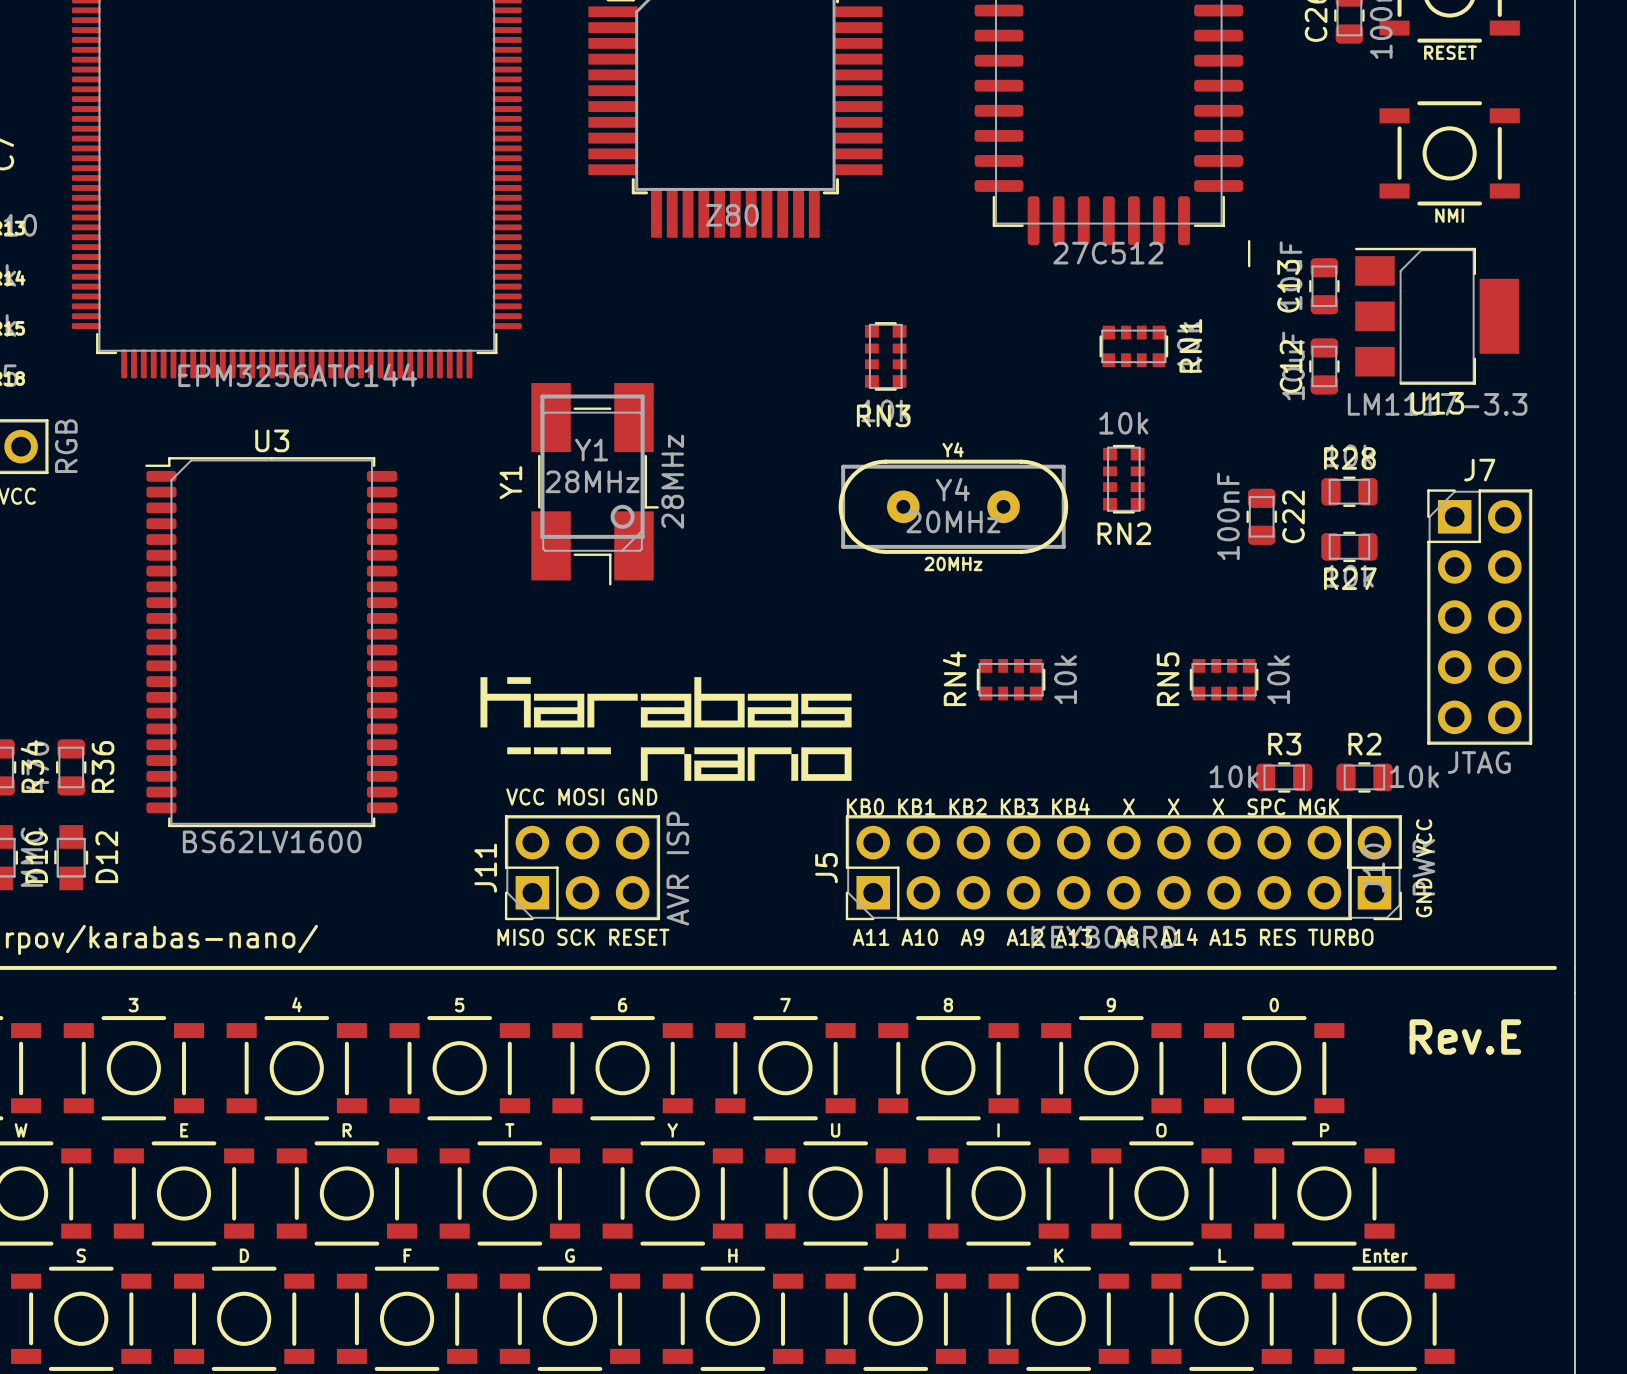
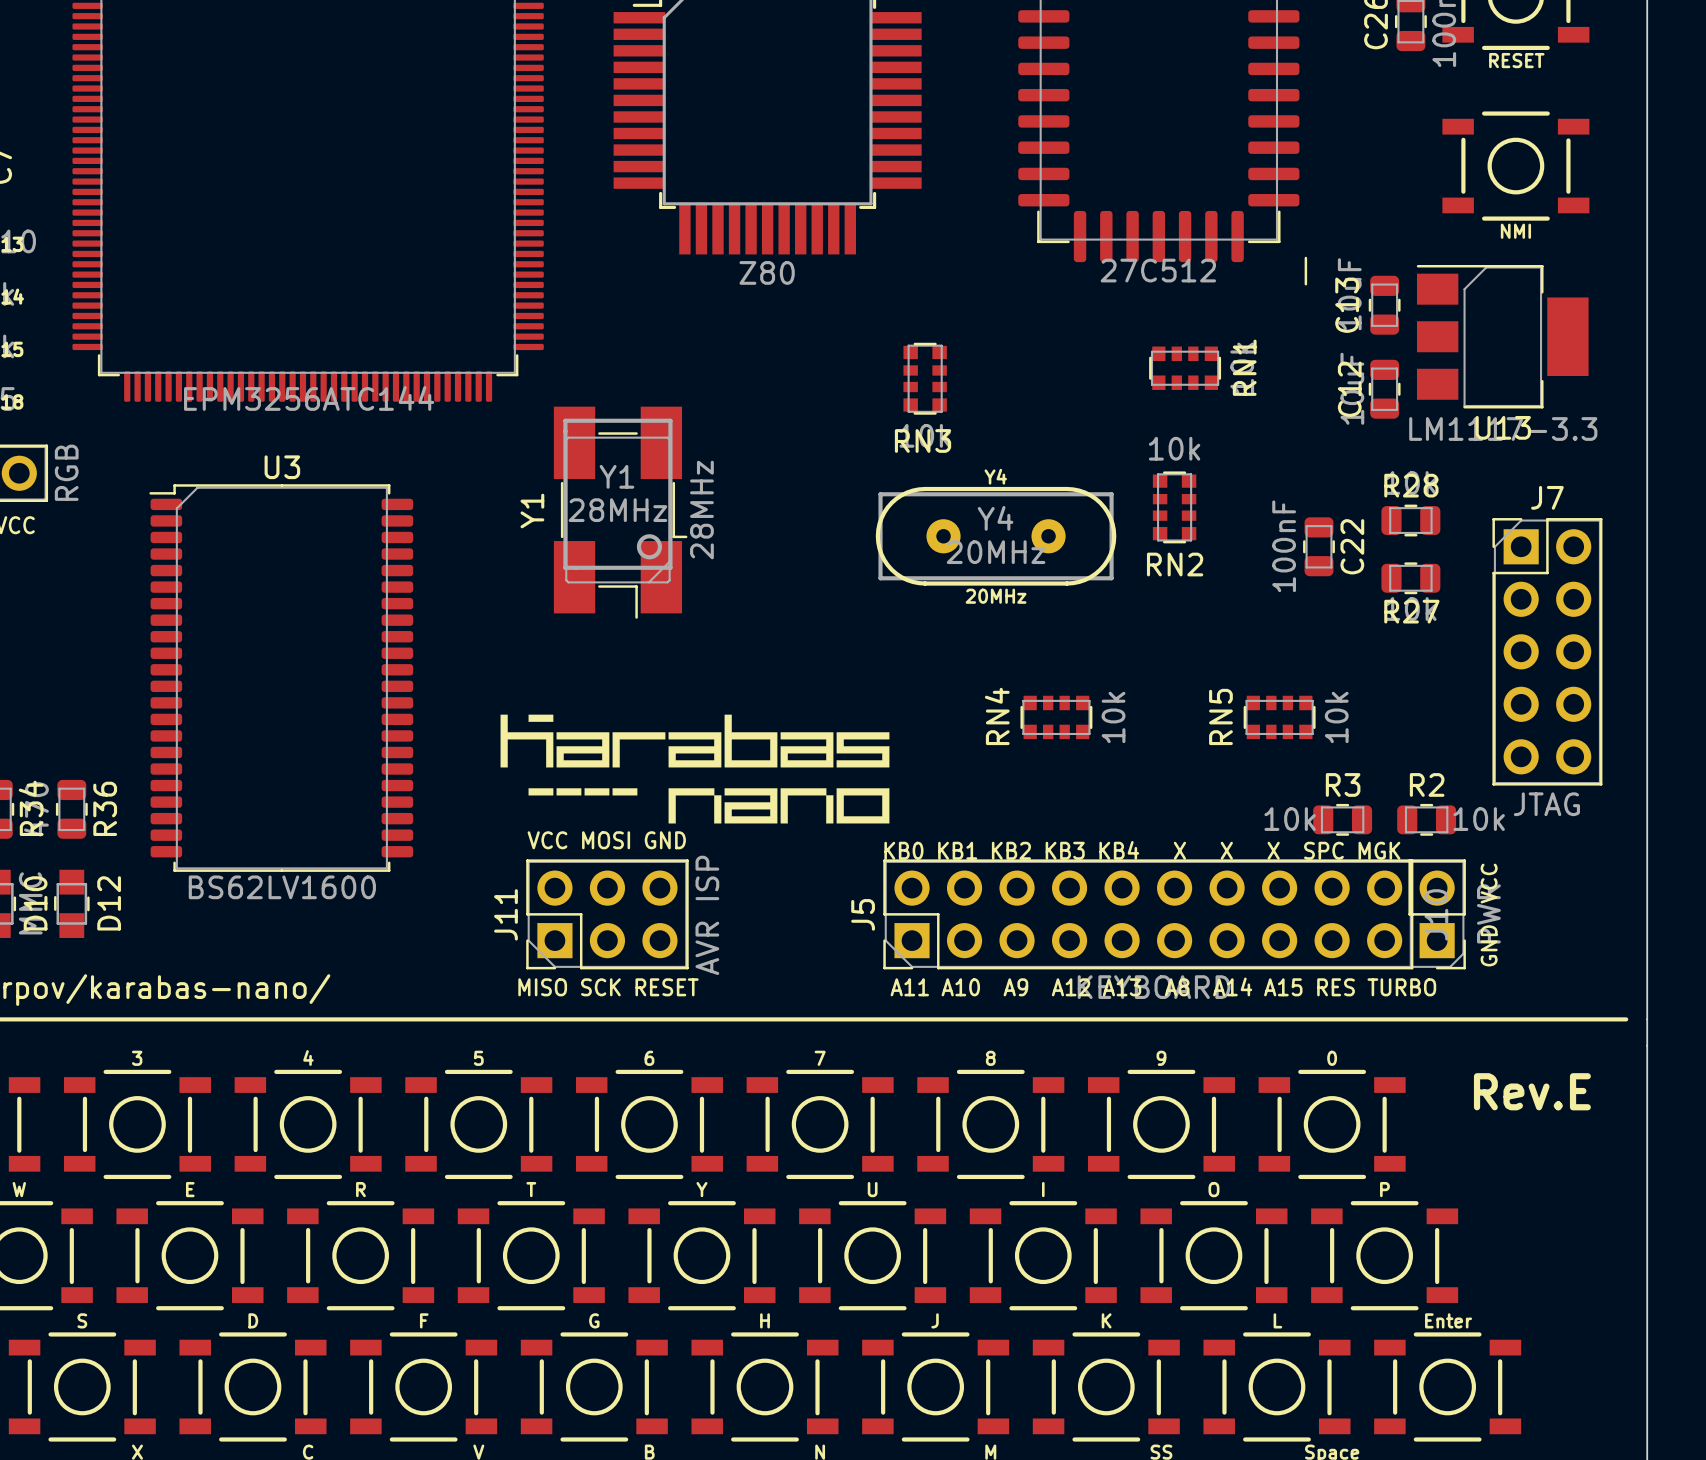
part value position: Z80 (732, 215) -> Z80 (767, 272)

